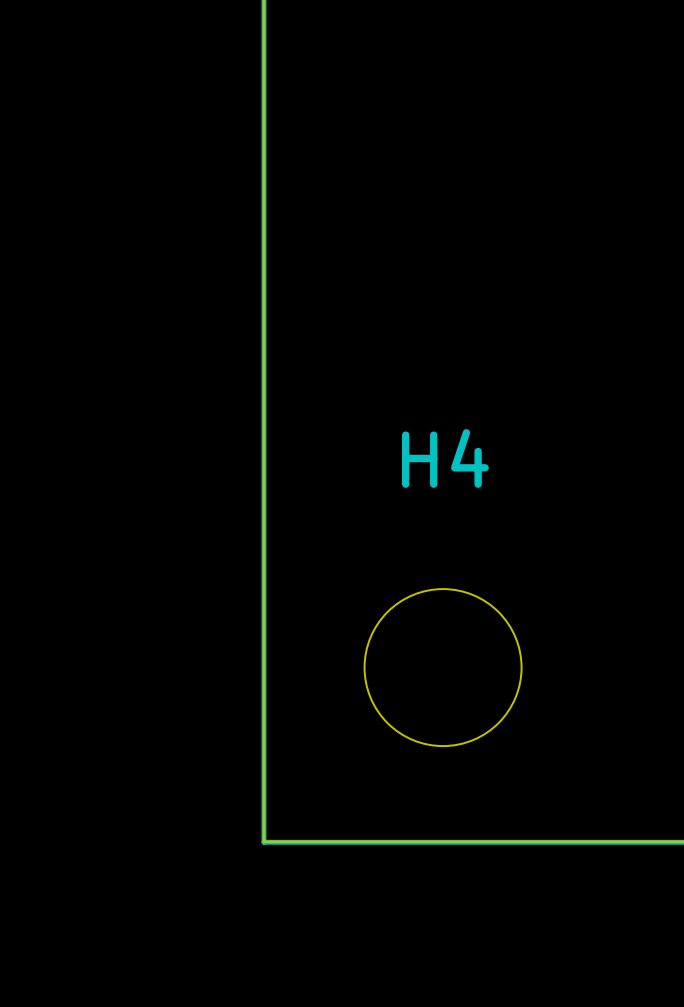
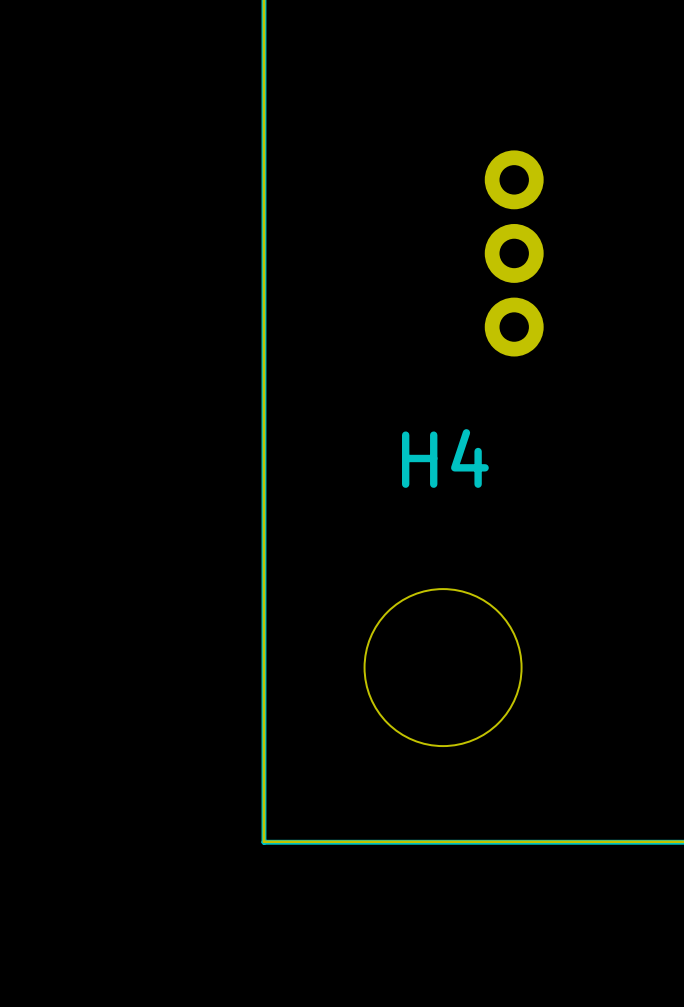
part: none -> (514, 253)

